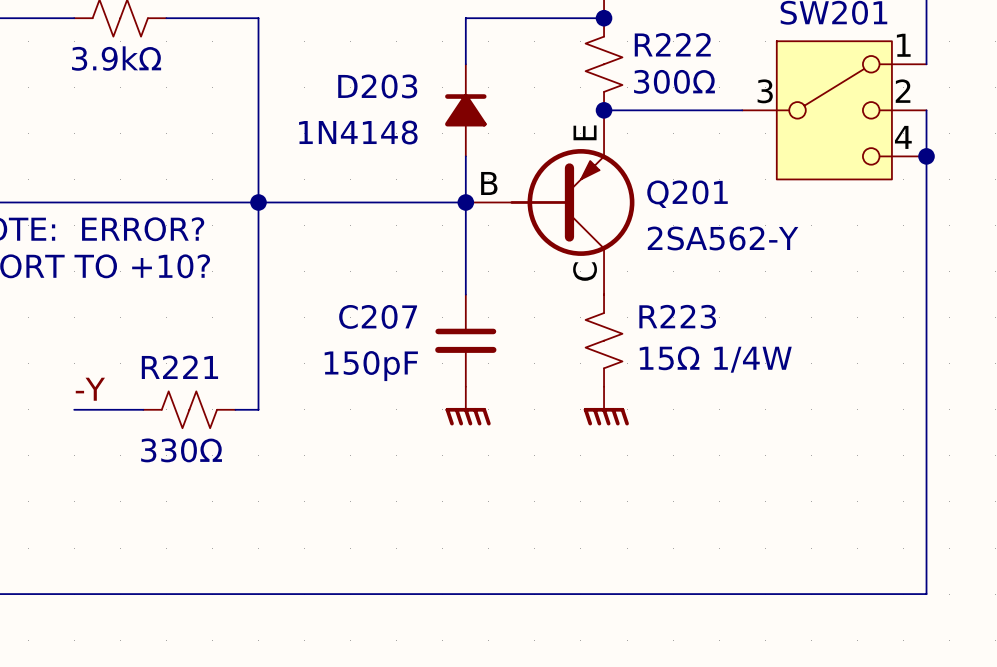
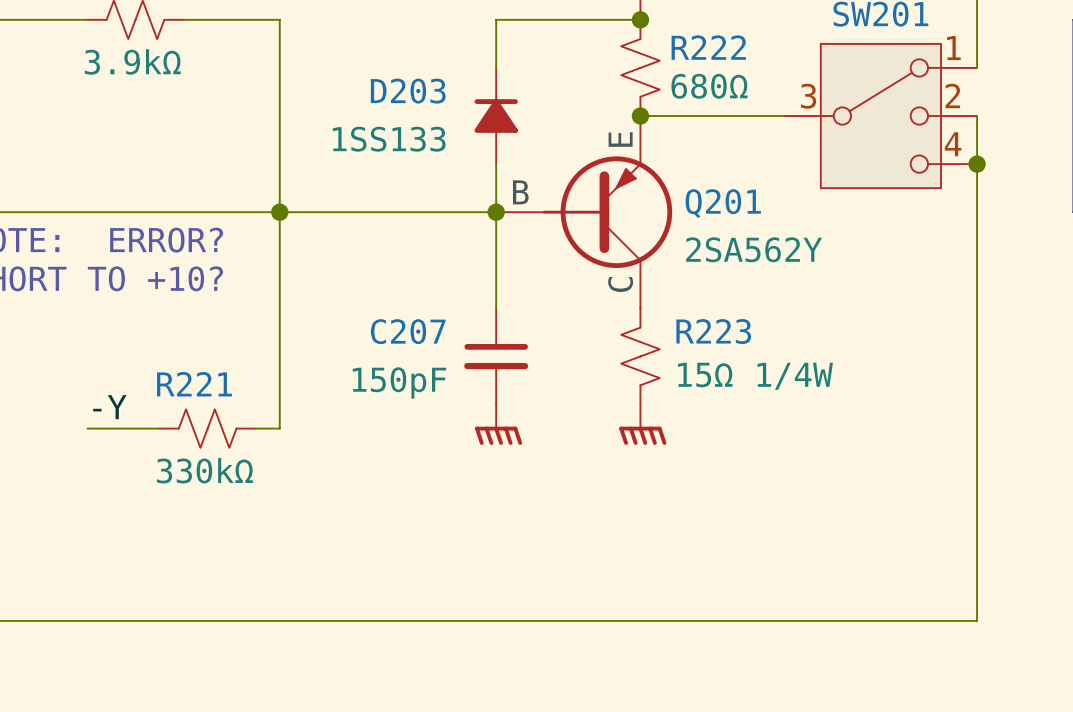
R222 value: 300Ω (674, 81) -> 680Ω (709, 86)
D203 value: 1N4148 (358, 132) -> 1SS133 (389, 139)
Q201 value: 2SA562-Y (723, 238) -> 2SA562Y (754, 249)
R221 value: 330Ω (181, 450) -> 330kΩ (204, 470)

